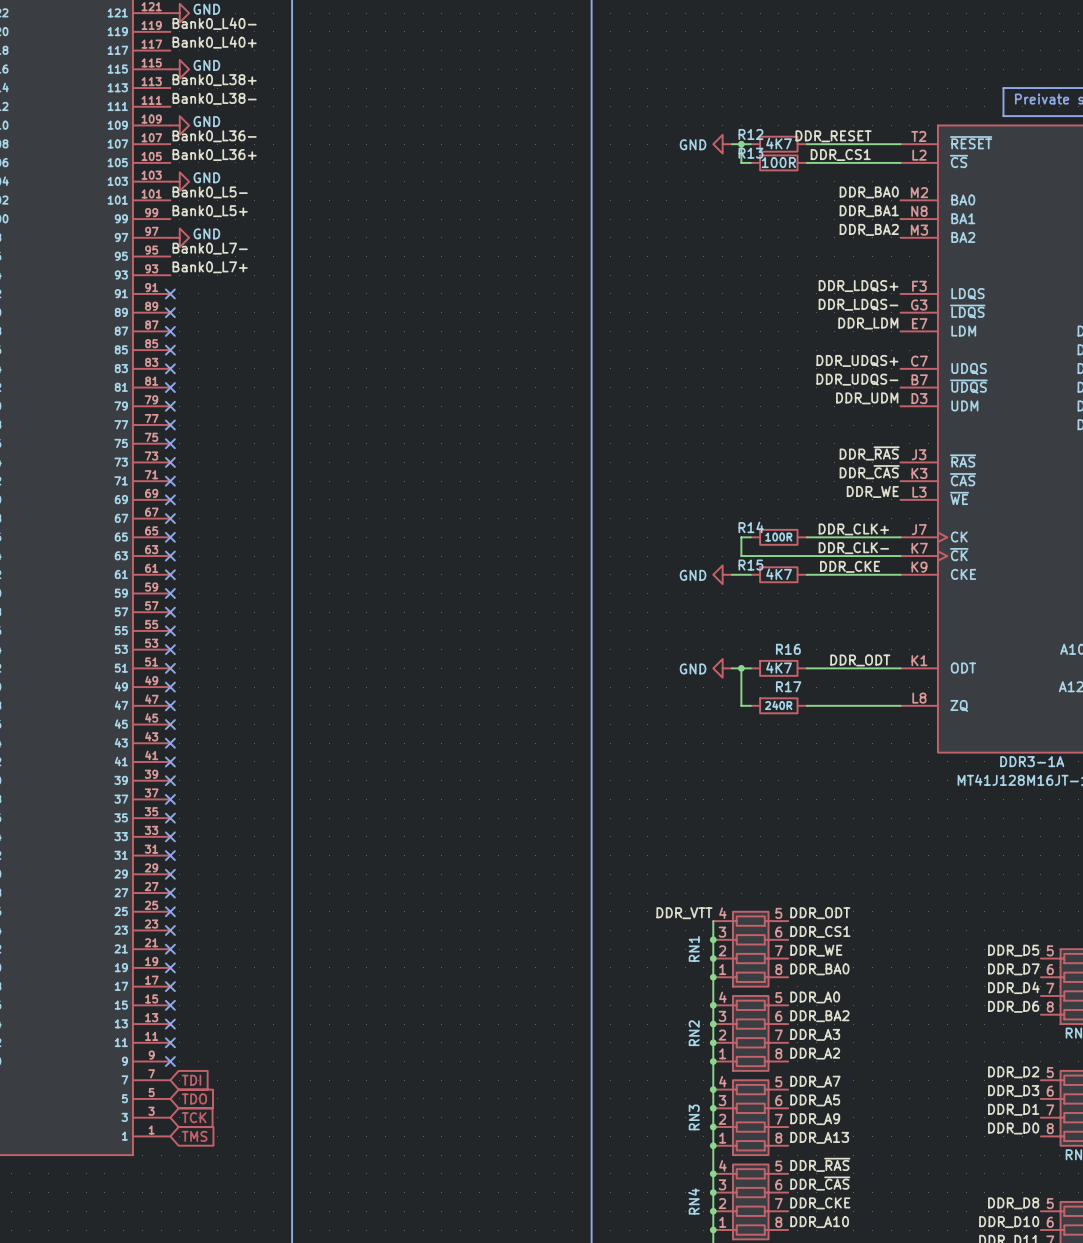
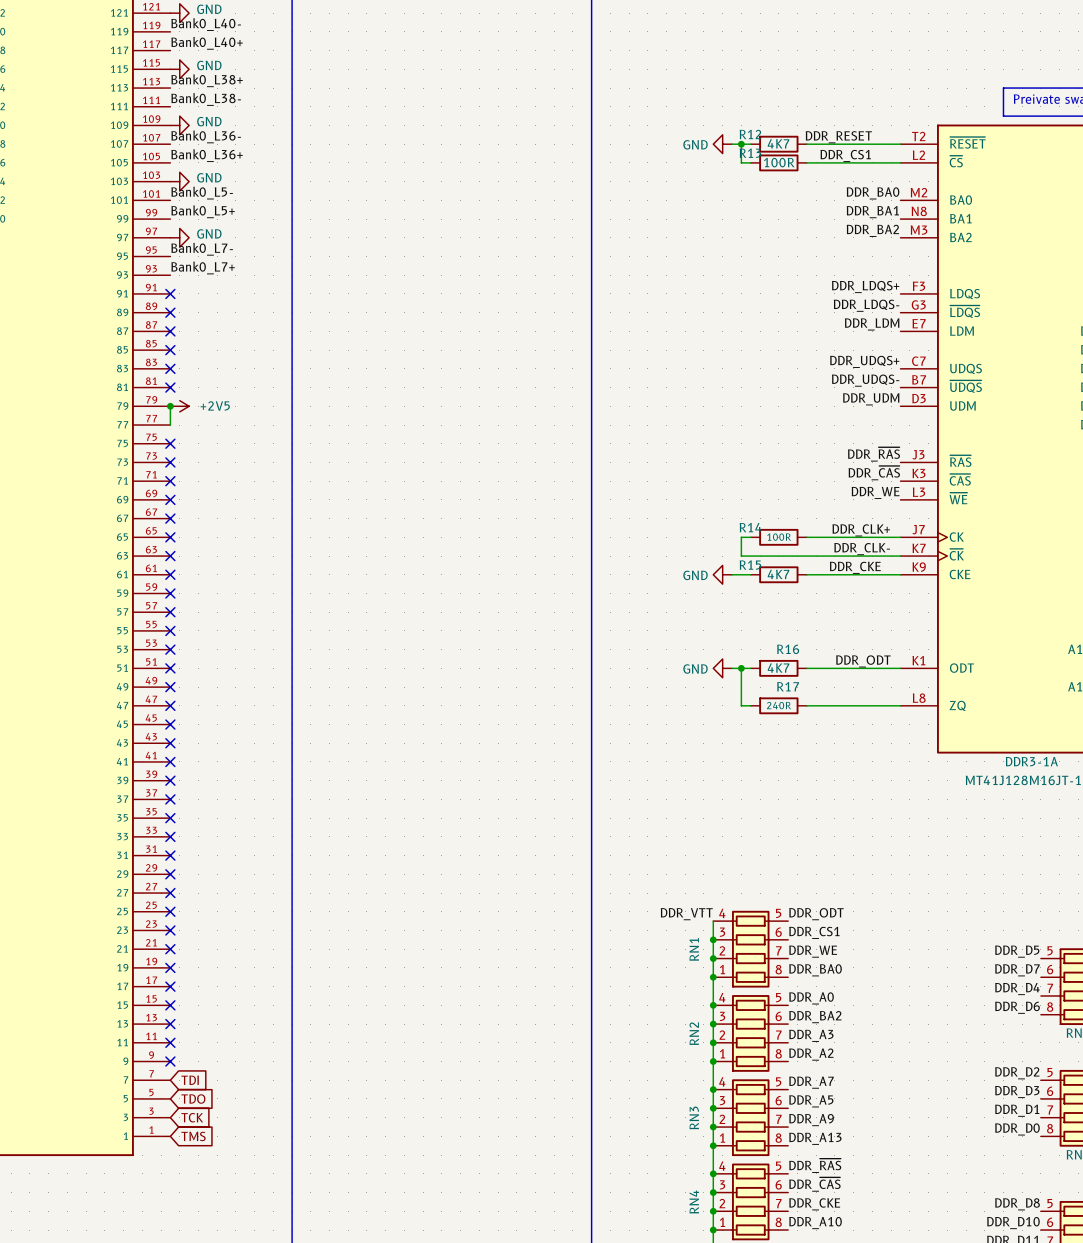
wire: none -> (170, 406) (170, 425)
no-connect mark: (170, 406) -> none
junction: none -> (170, 406)
power symbol: none -> +2V5 (179, 406)
no-connect mark: (170, 425) -> none

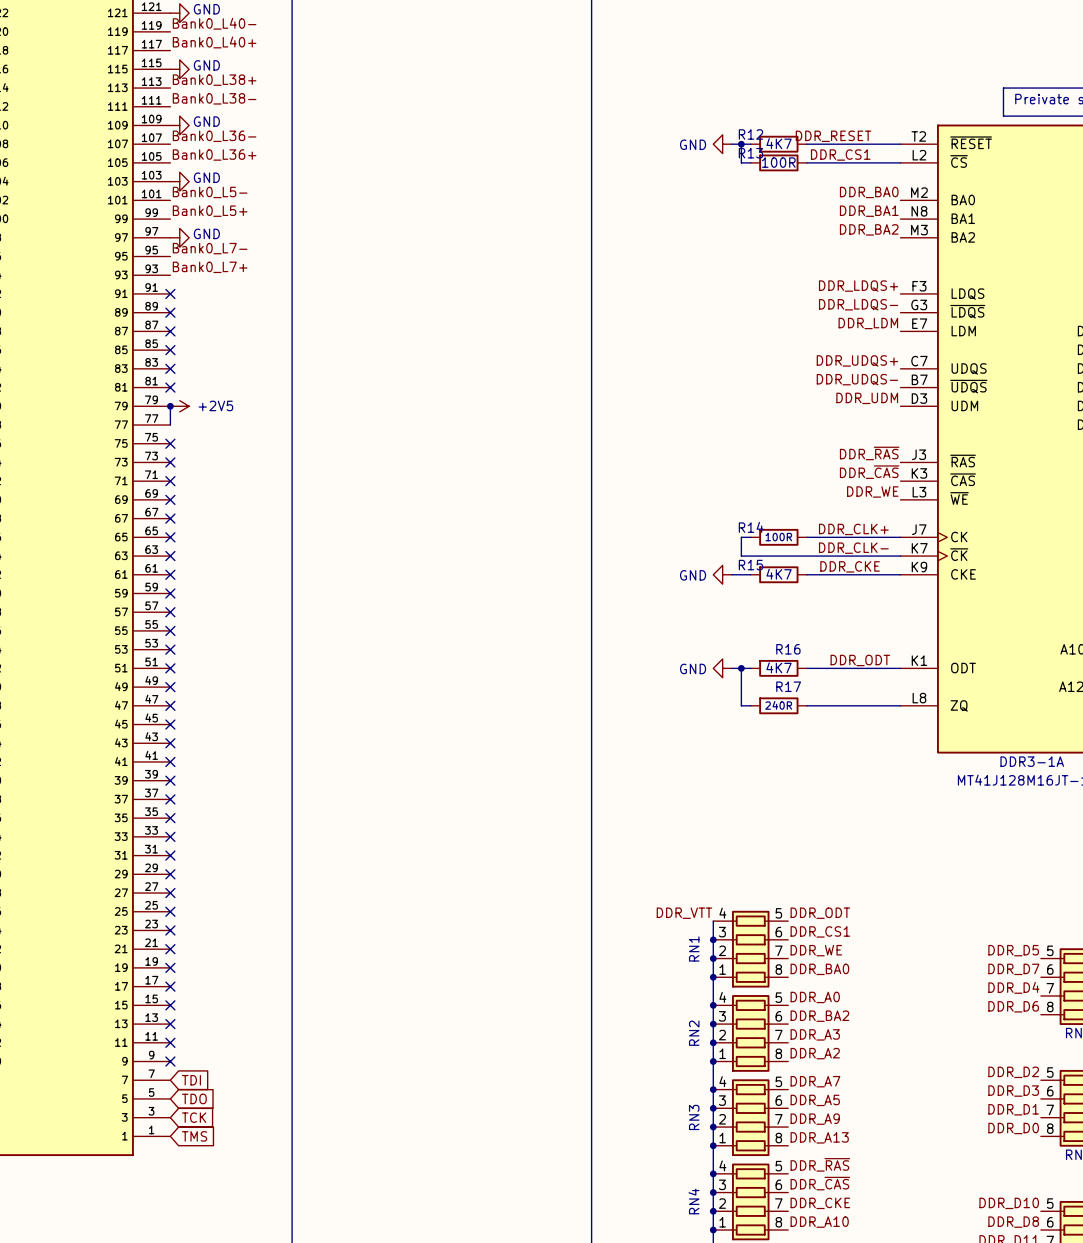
label: DDR_D8 (1017, 1204) -> DDR_D10 (1009, 1203)
label: DDR_D10 (1013, 1223) -> DDR_D8 (1013, 1222)

